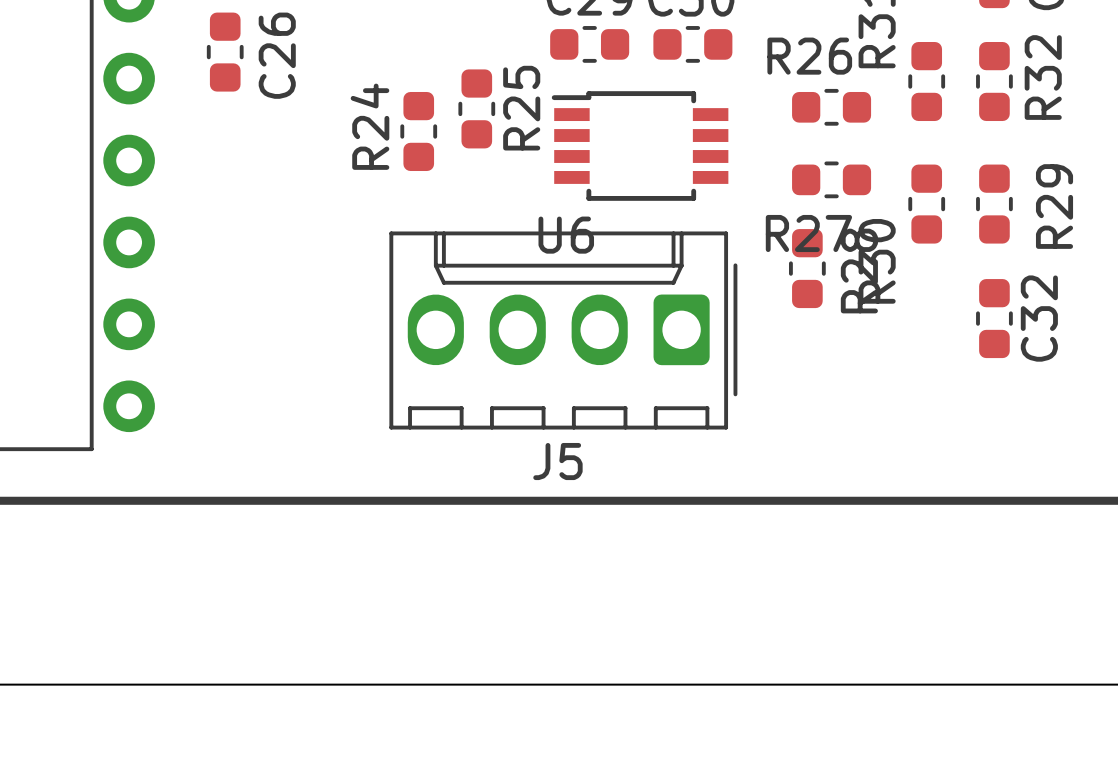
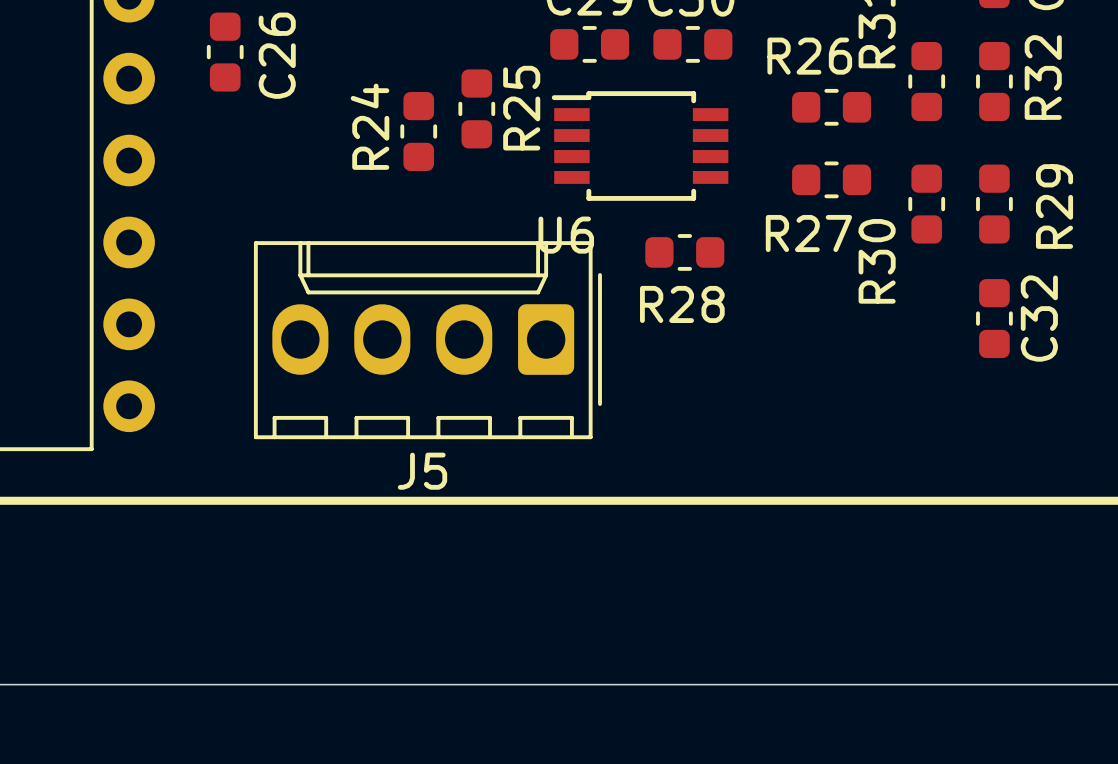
R28 rotation: 0° (807, 268) -> 90° clockwise (684, 252)
R28 position: (807, 268) -> (684, 252)
J5 position: (563, 330) -> (427, 340)

